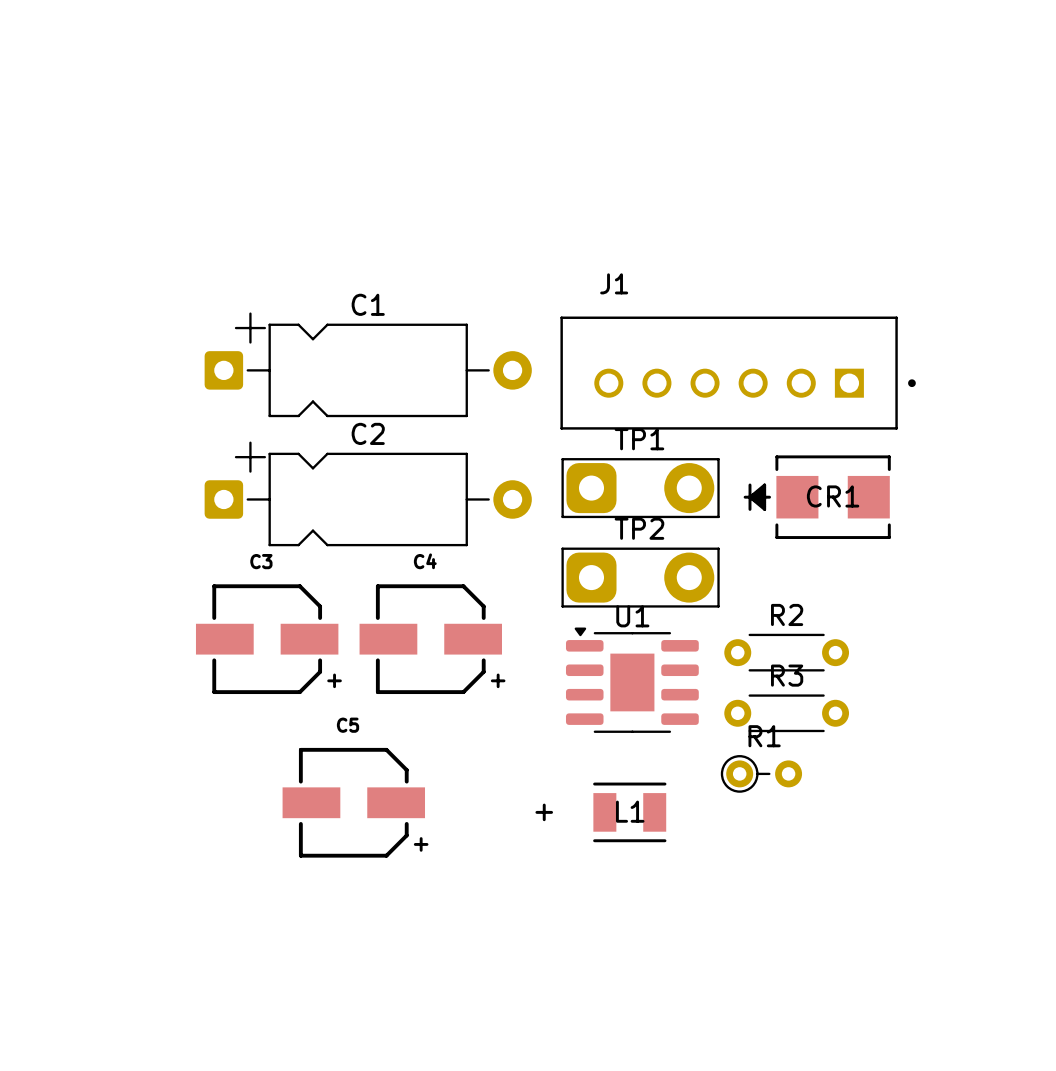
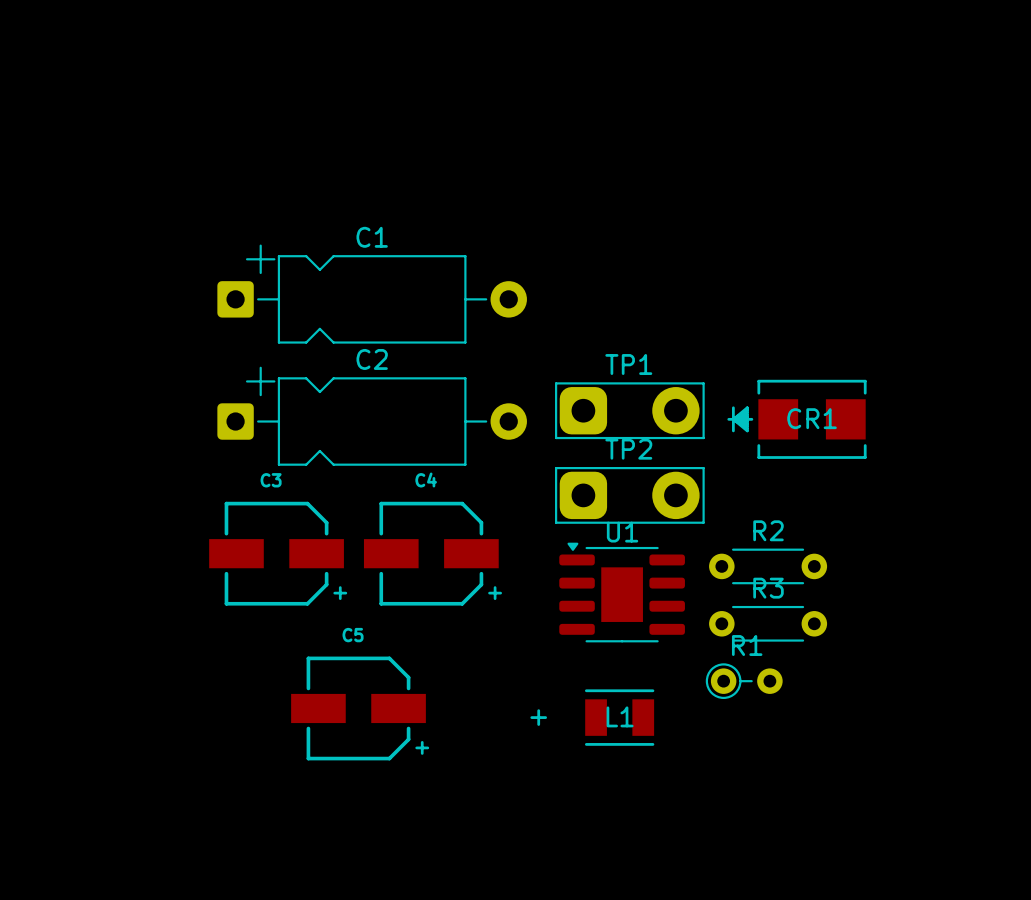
J1: (738, 373) -> none

